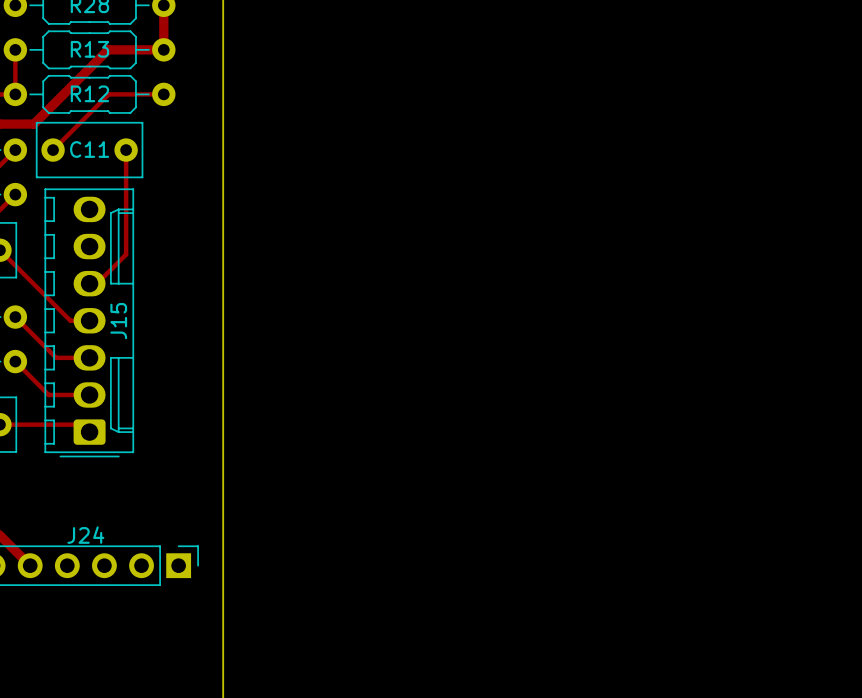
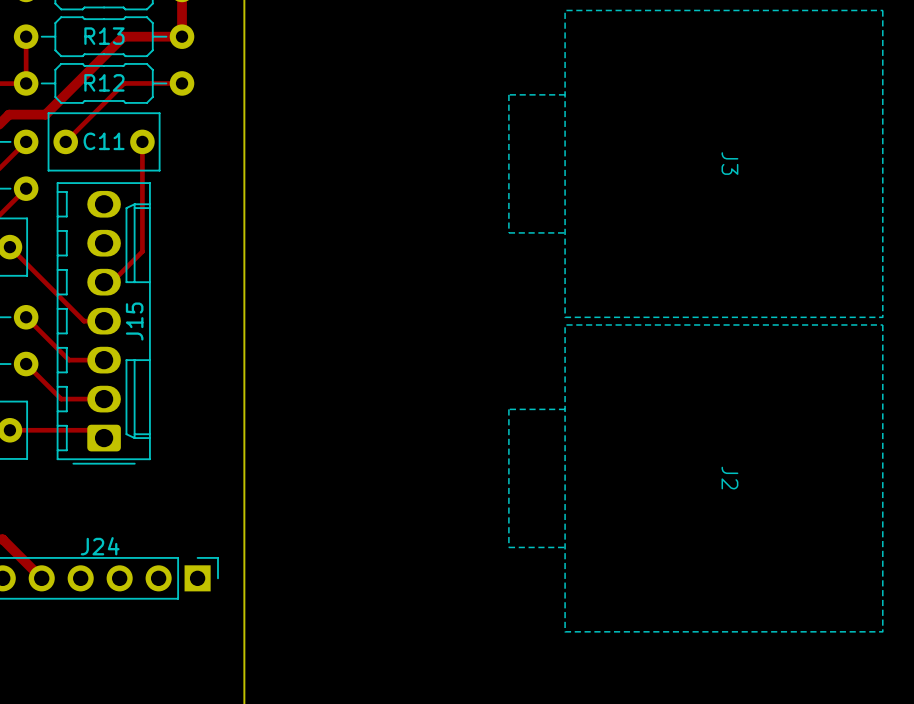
J3: none -> (695, 163)
J2: none -> (695, 478)

